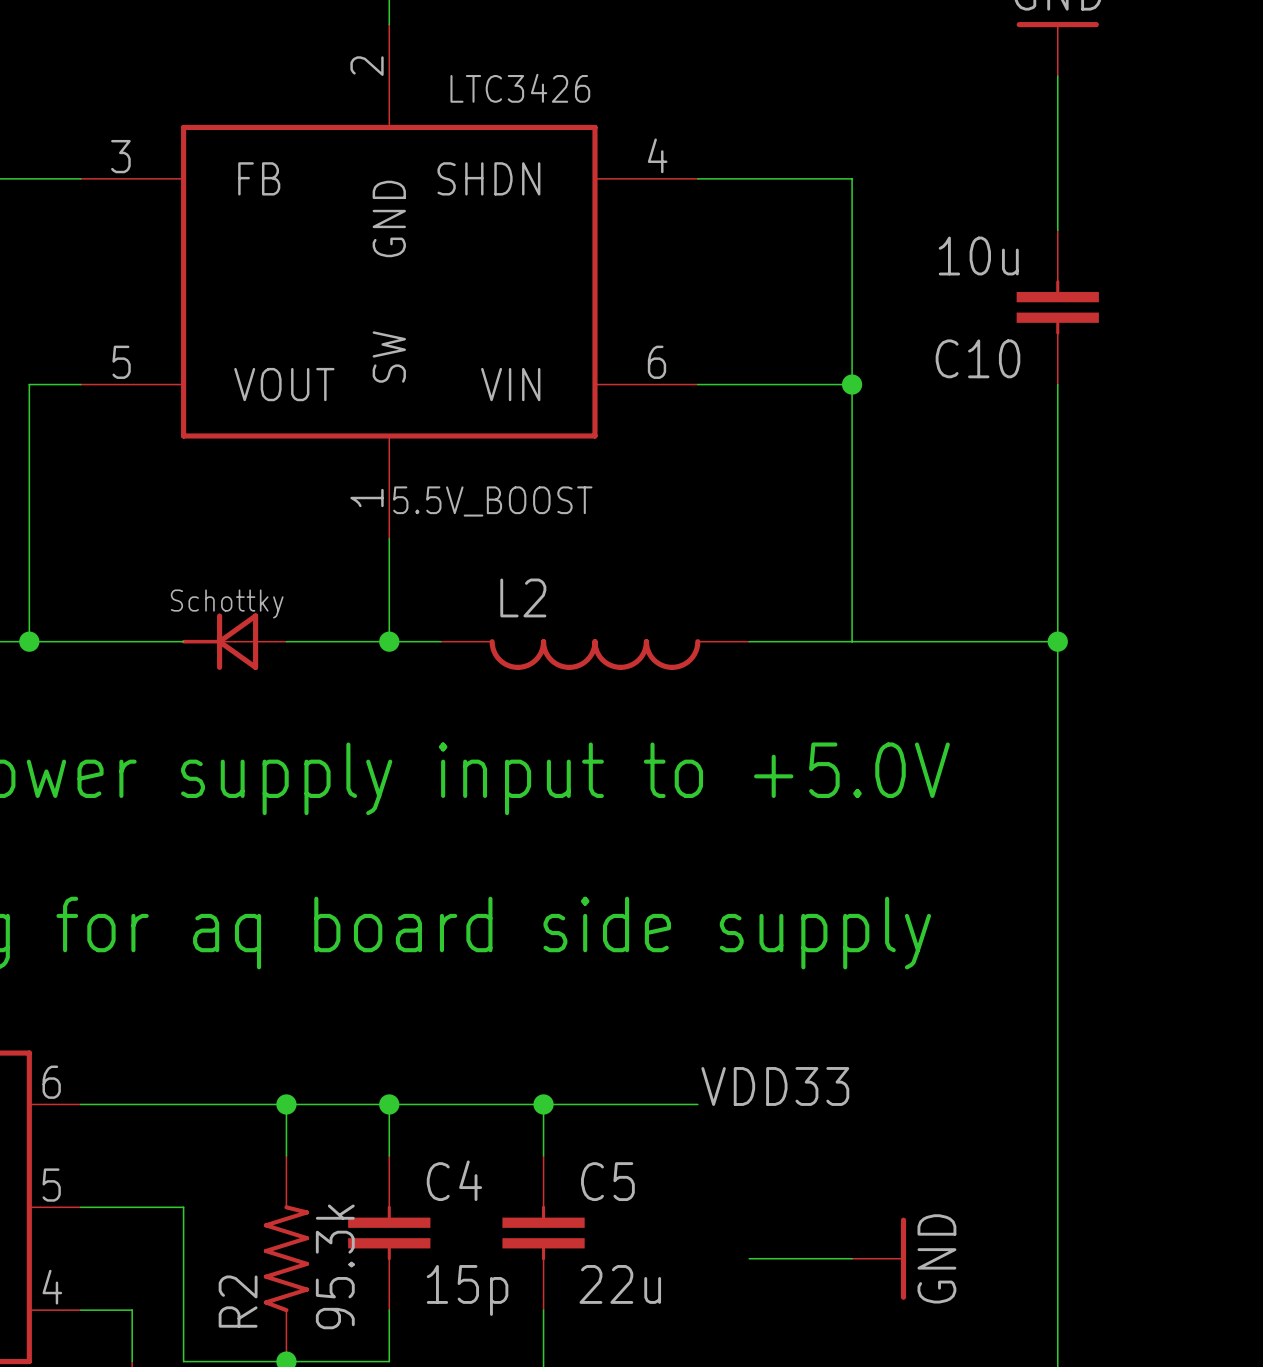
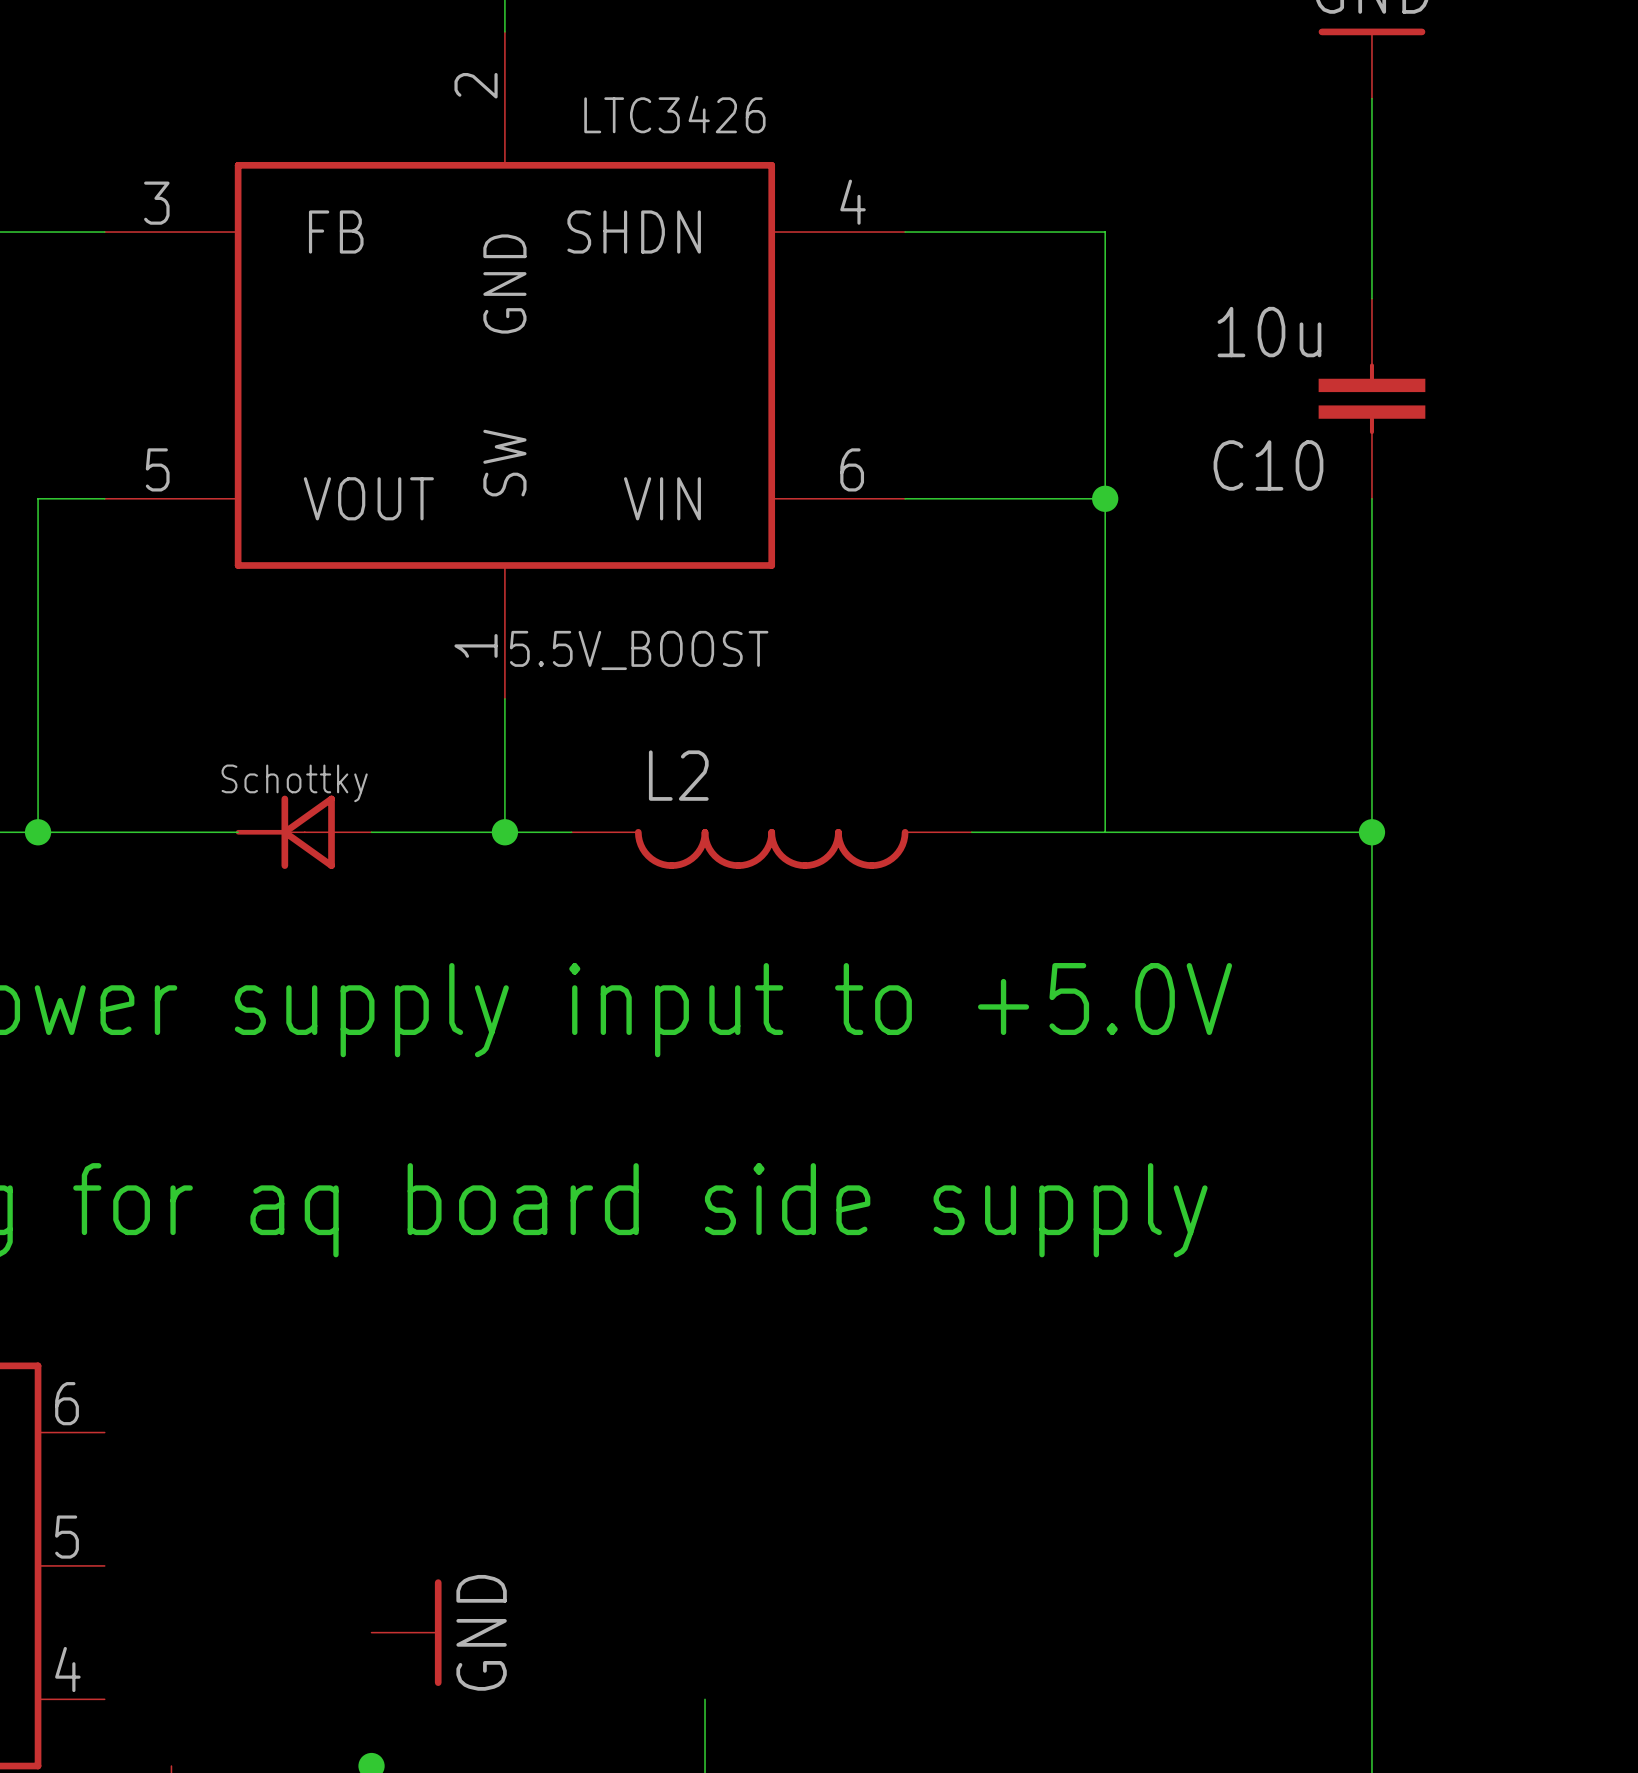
label: VDD33 (775, 1086) -> none
wire: (80, 1104) (697, 1104) -> none
wire: (286, 1104) (286, 1155) -> none
junction: (286, 1104) -> none
wire: (389, 1104) (389, 1155) -> none
junction: (389, 1104) -> none
wire: (543, 1104) (543, 1155) -> none
junction: (543, 1104) -> none
wire: (80, 1207) (183, 1207) (183, 1361) (389, 1361) (389, 1310) -> none
C4: 15p (389, 1233) -> none
C5: 22u (543, 1233) -> none
R2: 95.3k (286, 1258) -> none
power symbol: none -> GND (406, 1632)
wire: (749, 1258) (852, 1258) -> none
power symbol: GND (879, 1258) -> none
wire: (80, 1310) (132, 1310) (132, 1361) -> none

